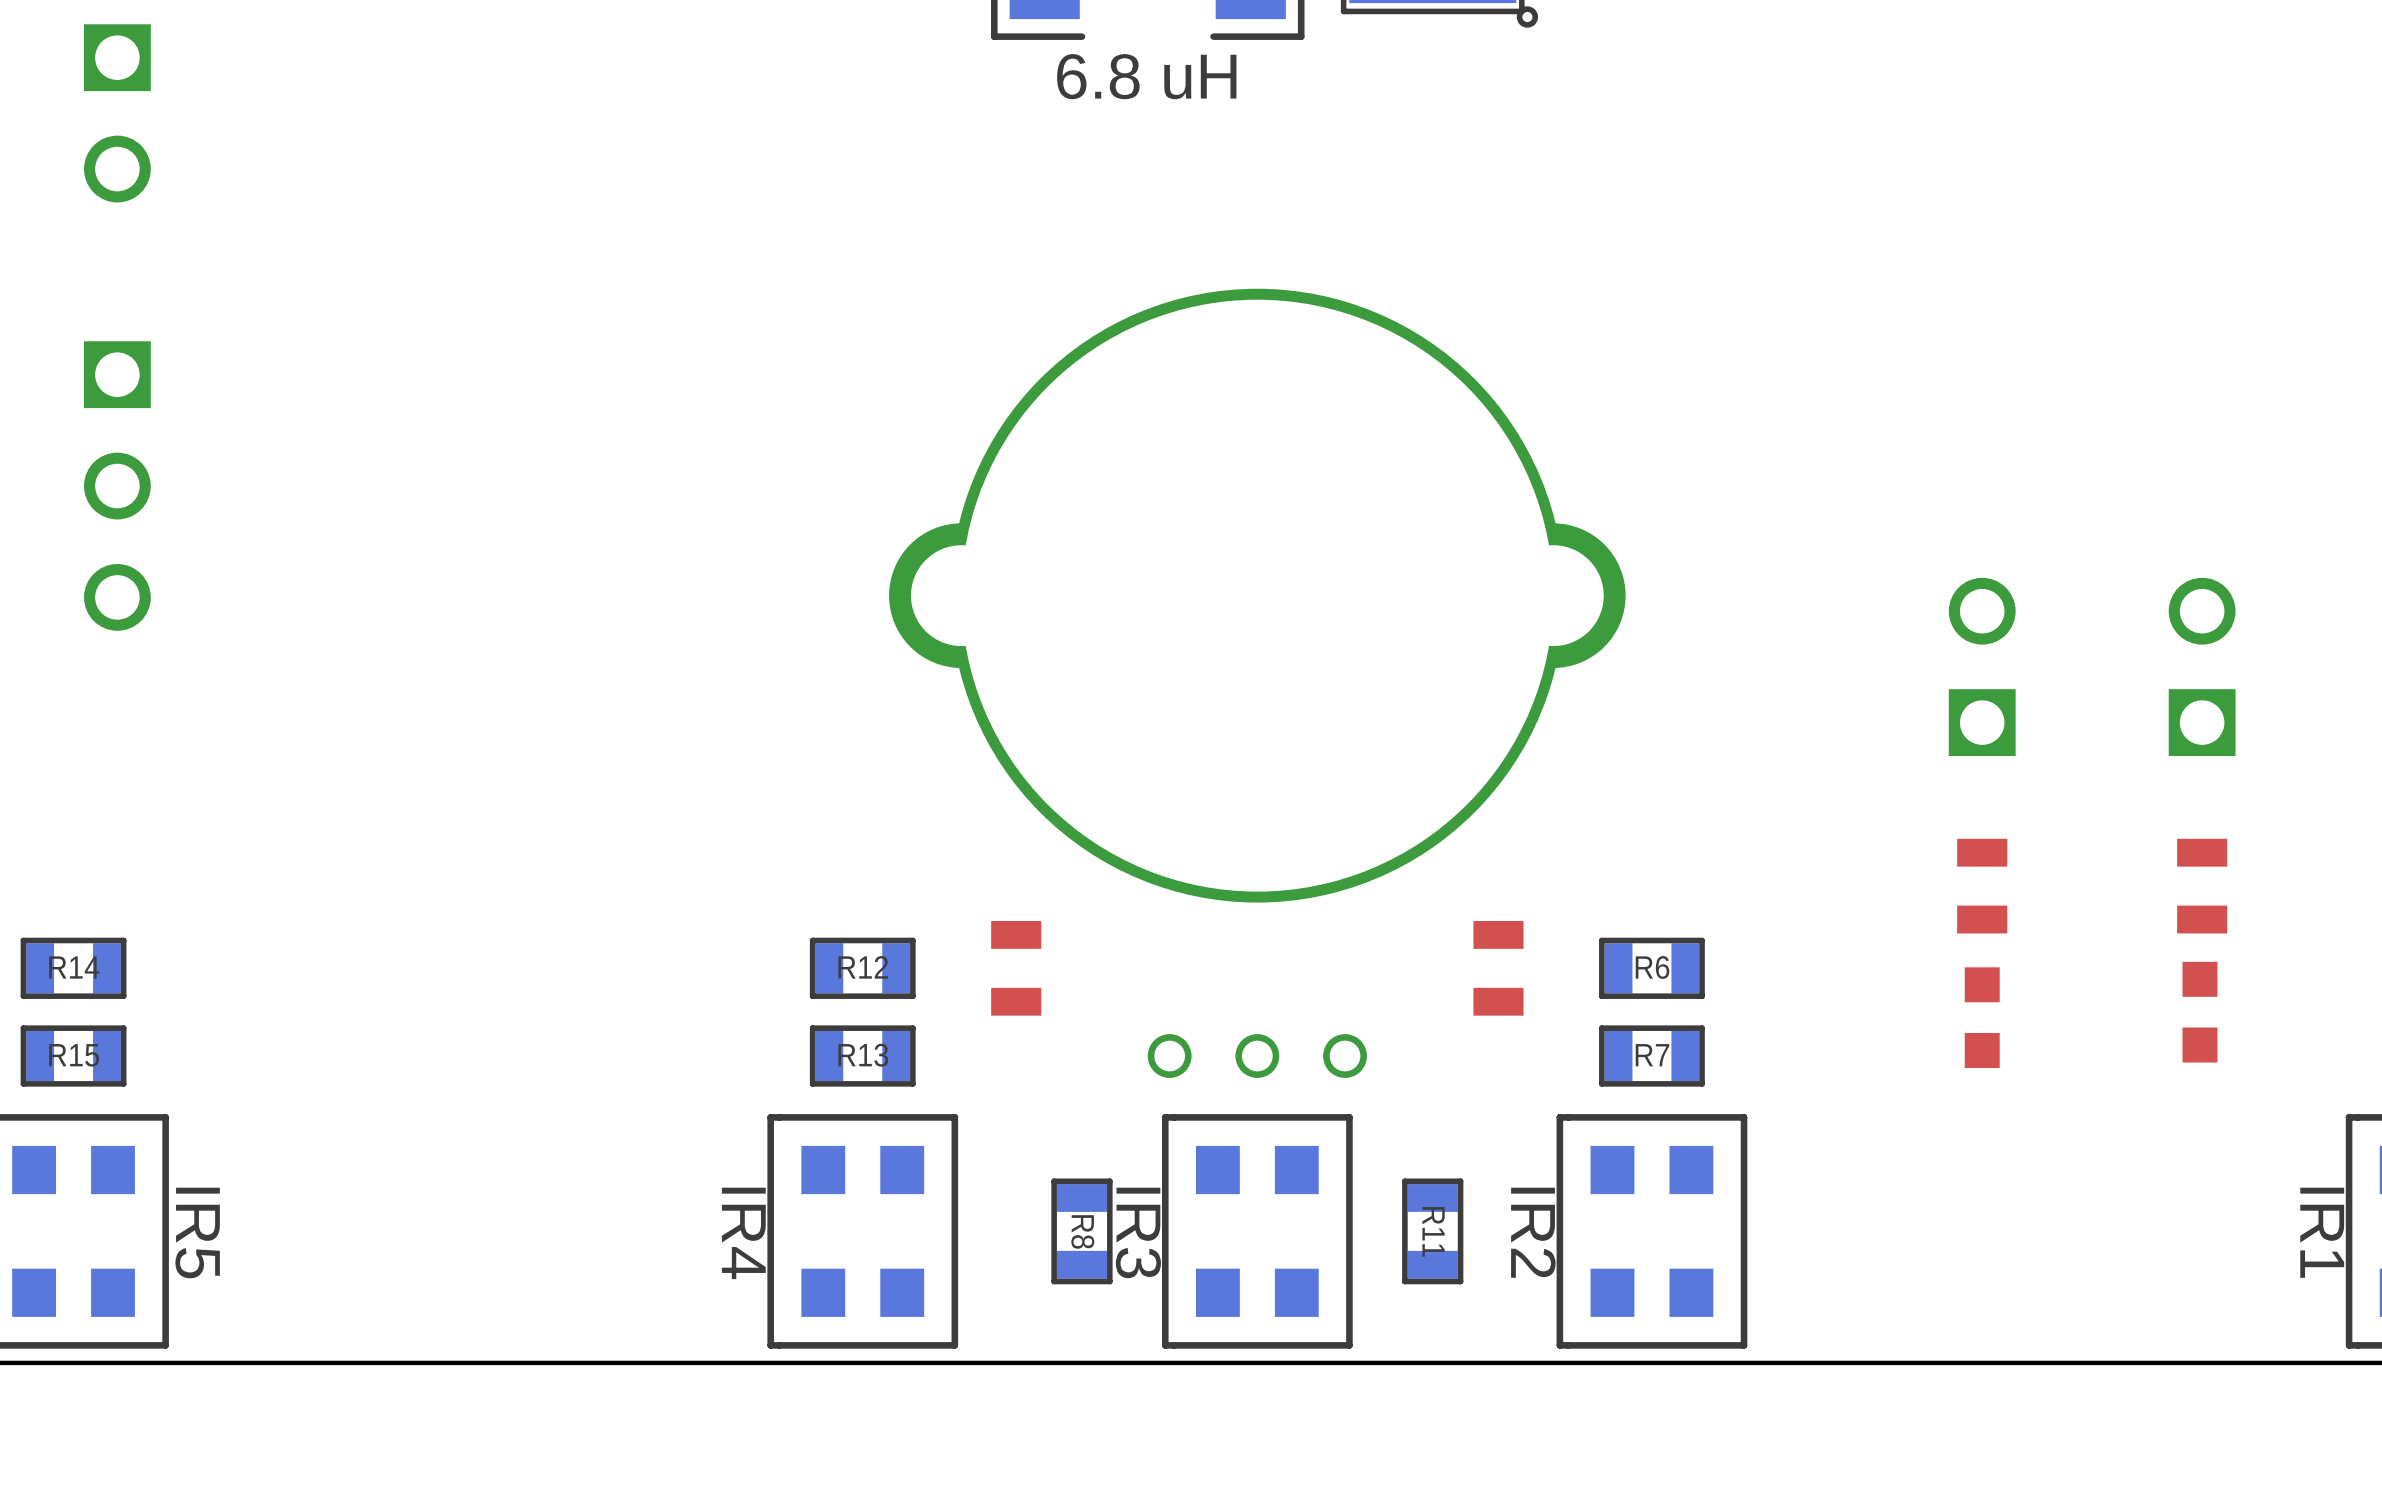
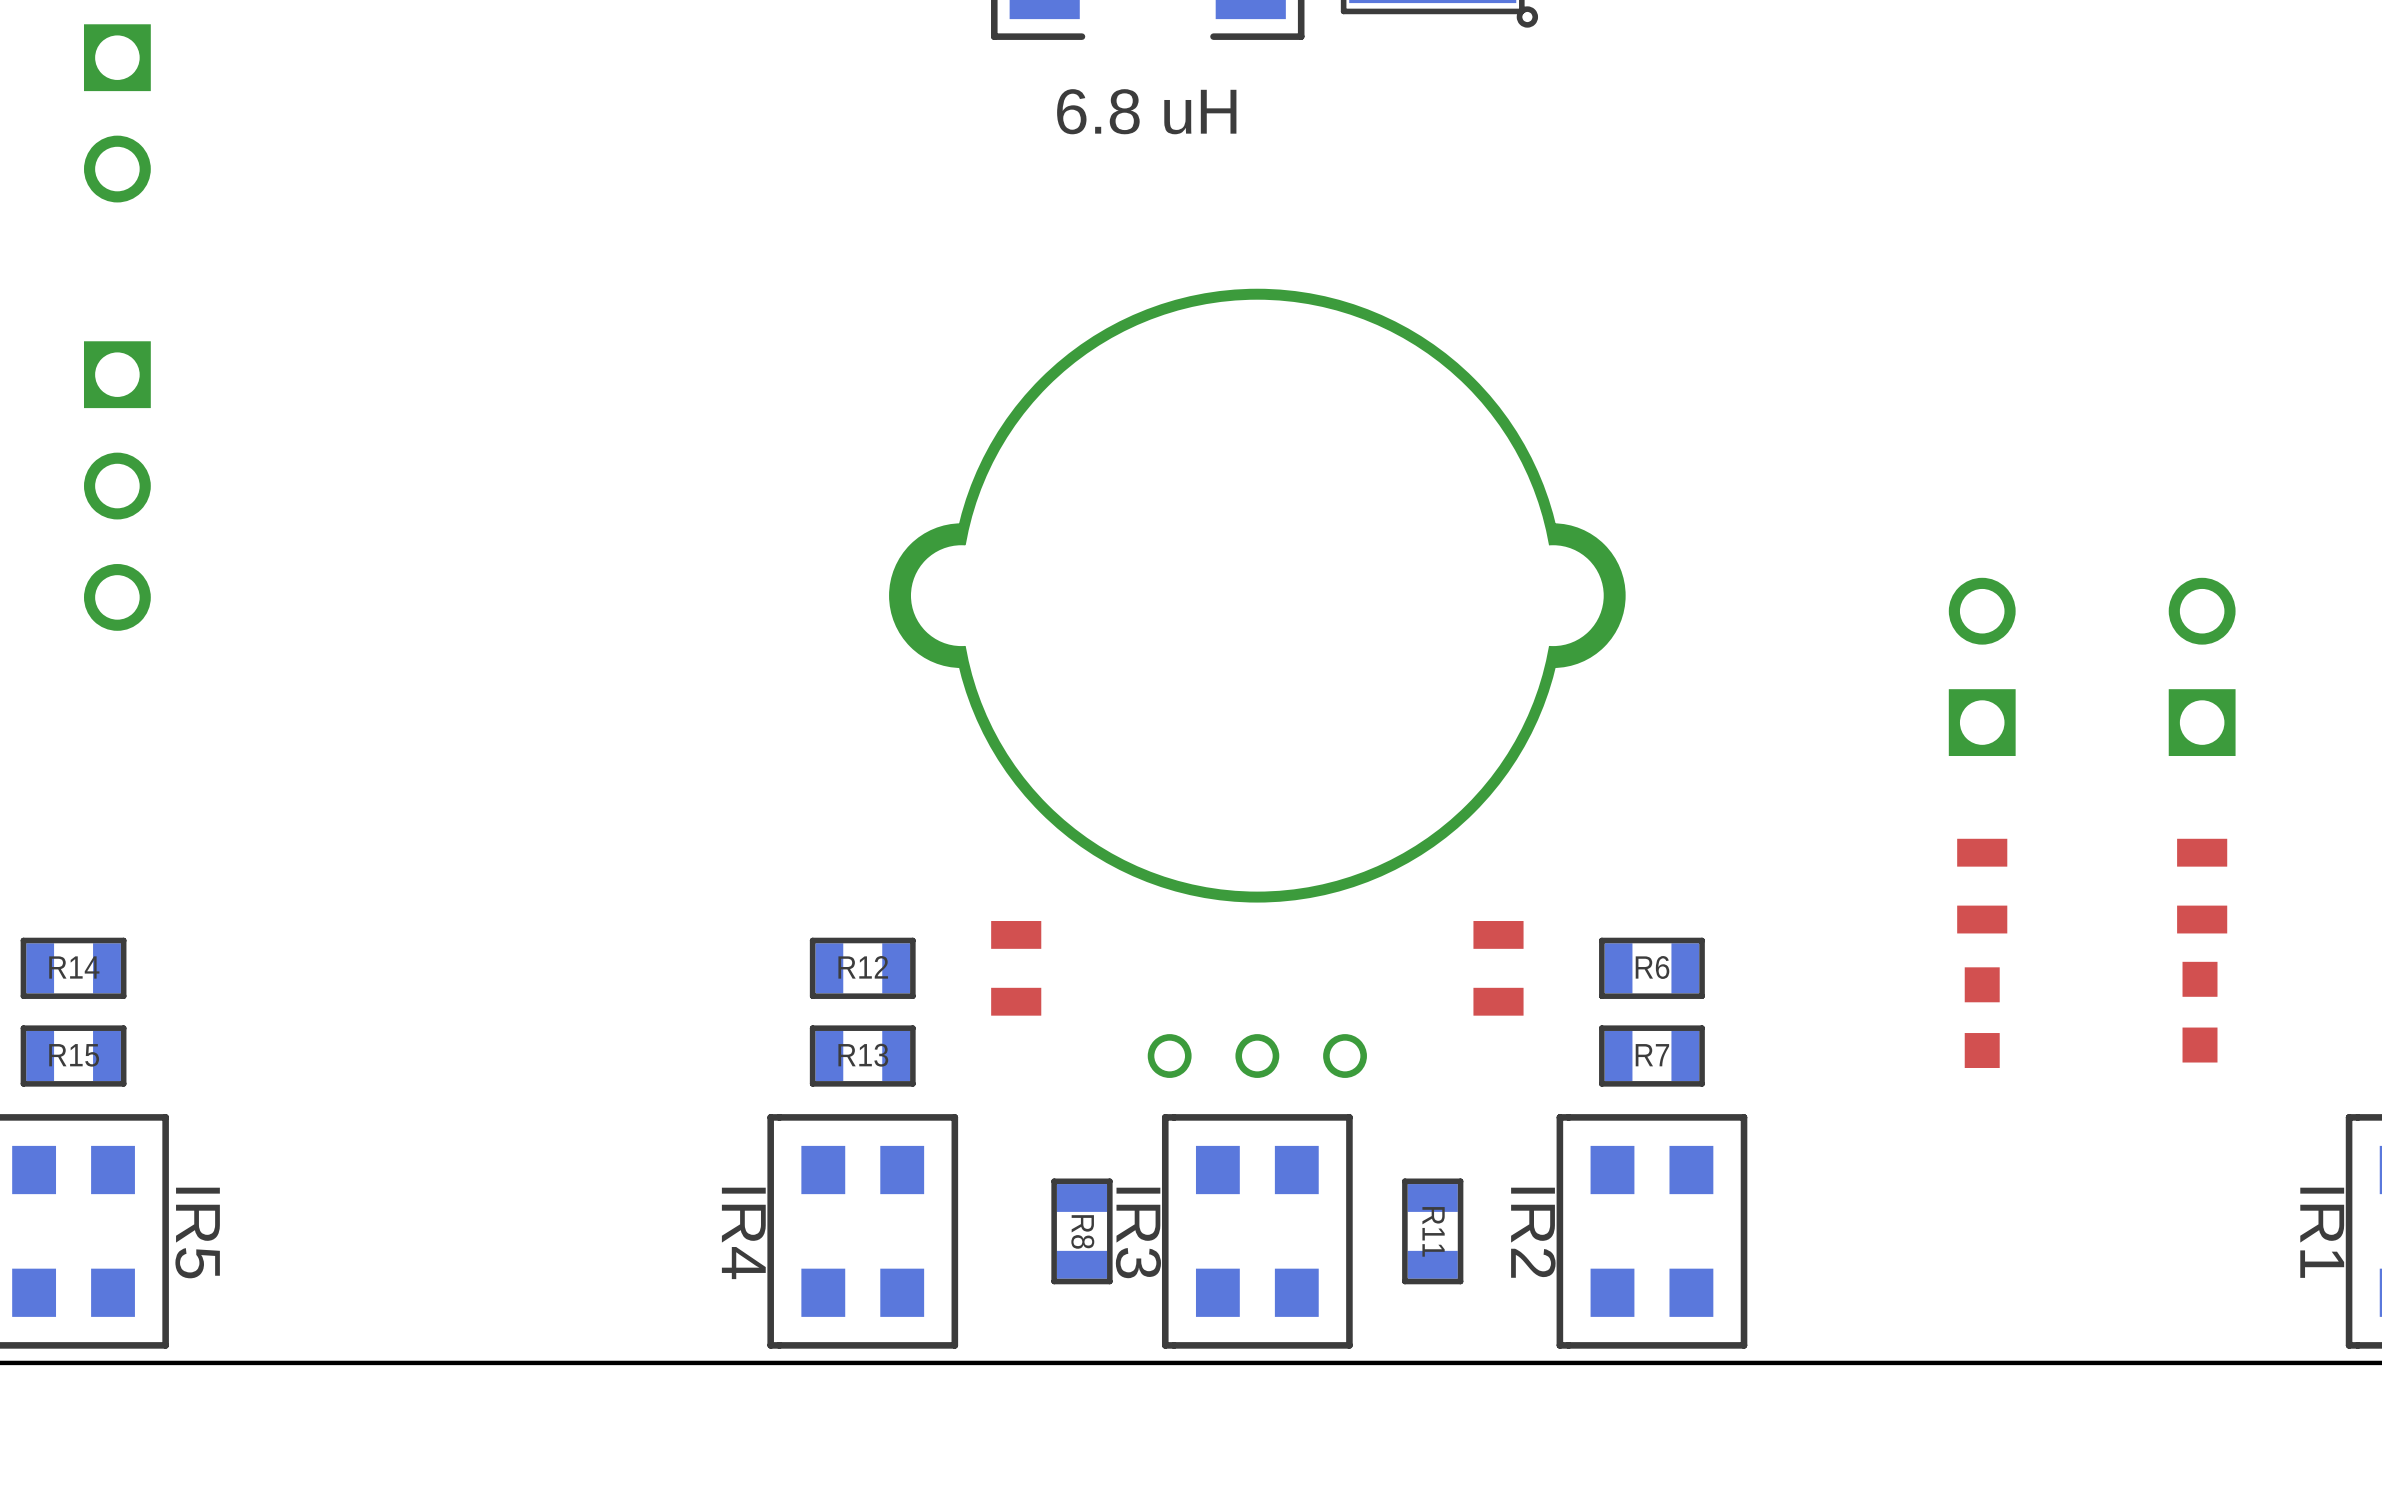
part value position: 6.8 uH (1146, 76) -> 6.8 uH (1146, 111)

